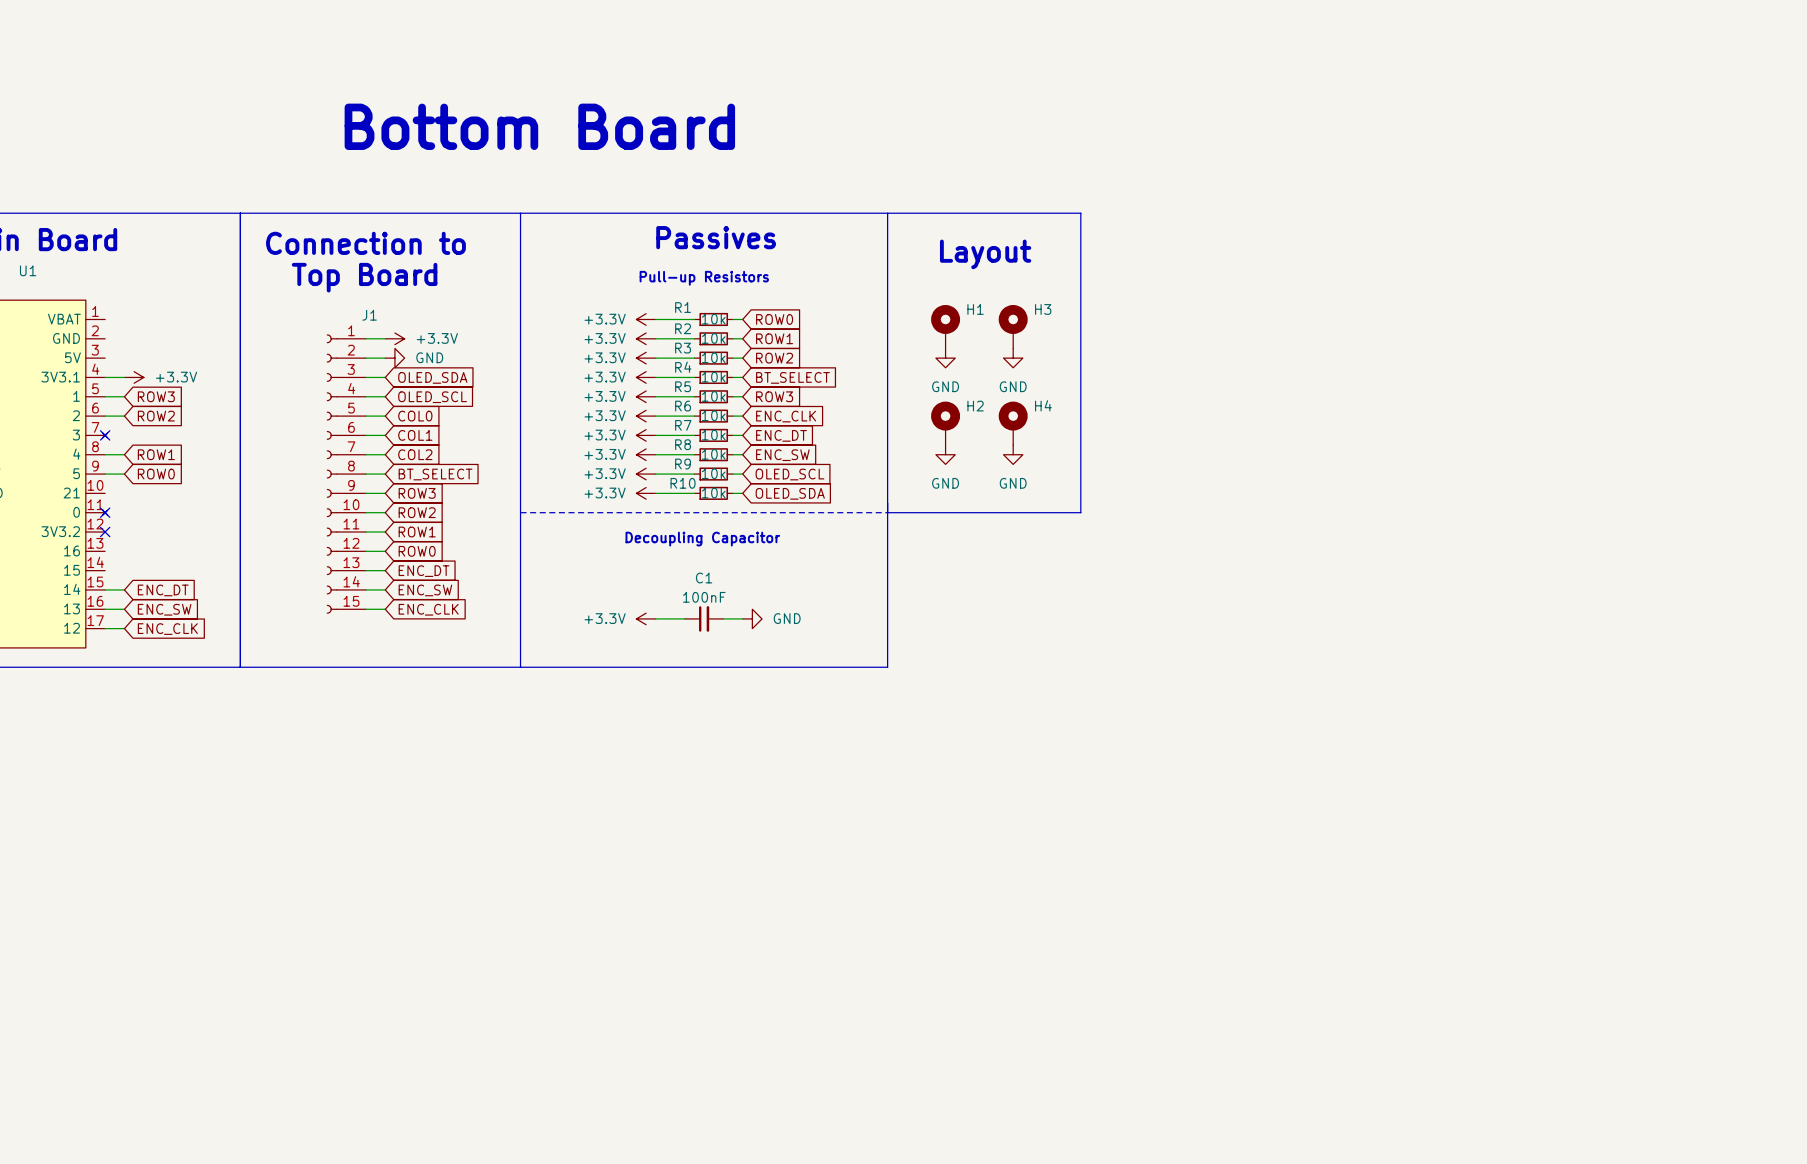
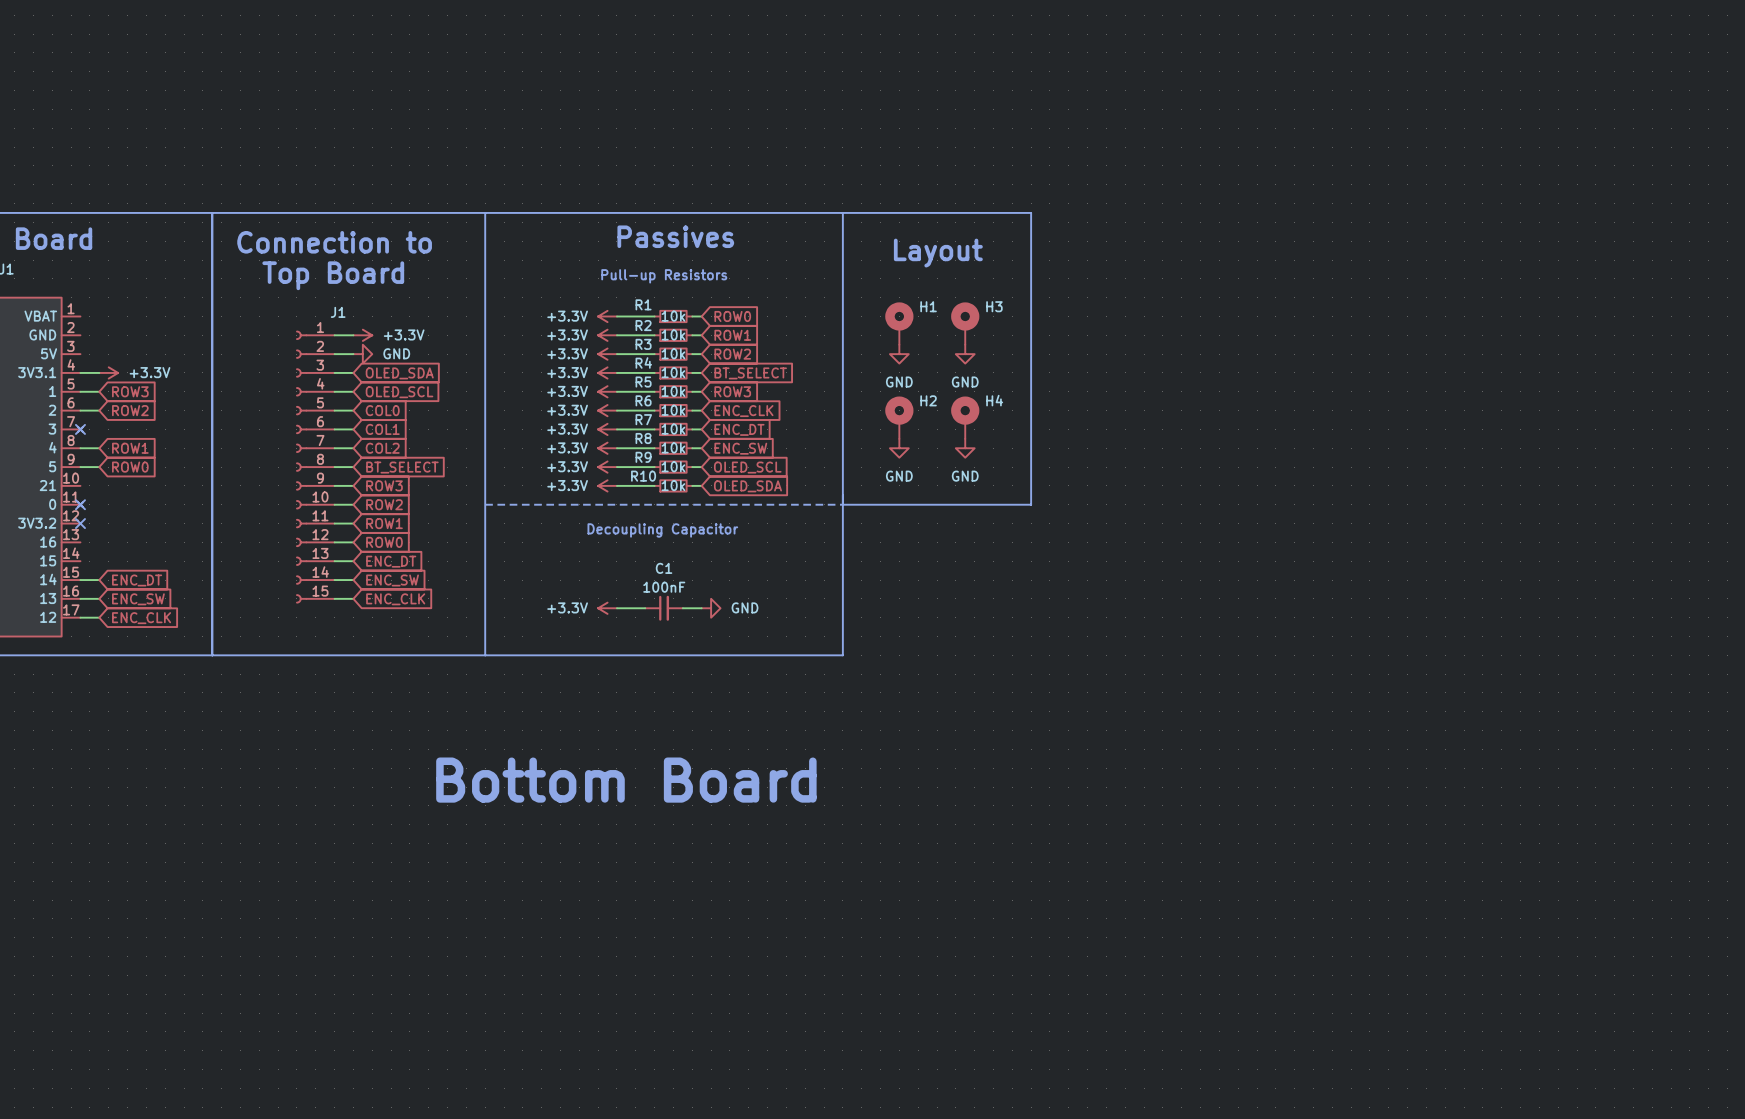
text: Bottom Board (539, 126) -> none
text: none -> Bottom Board (626, 780)

